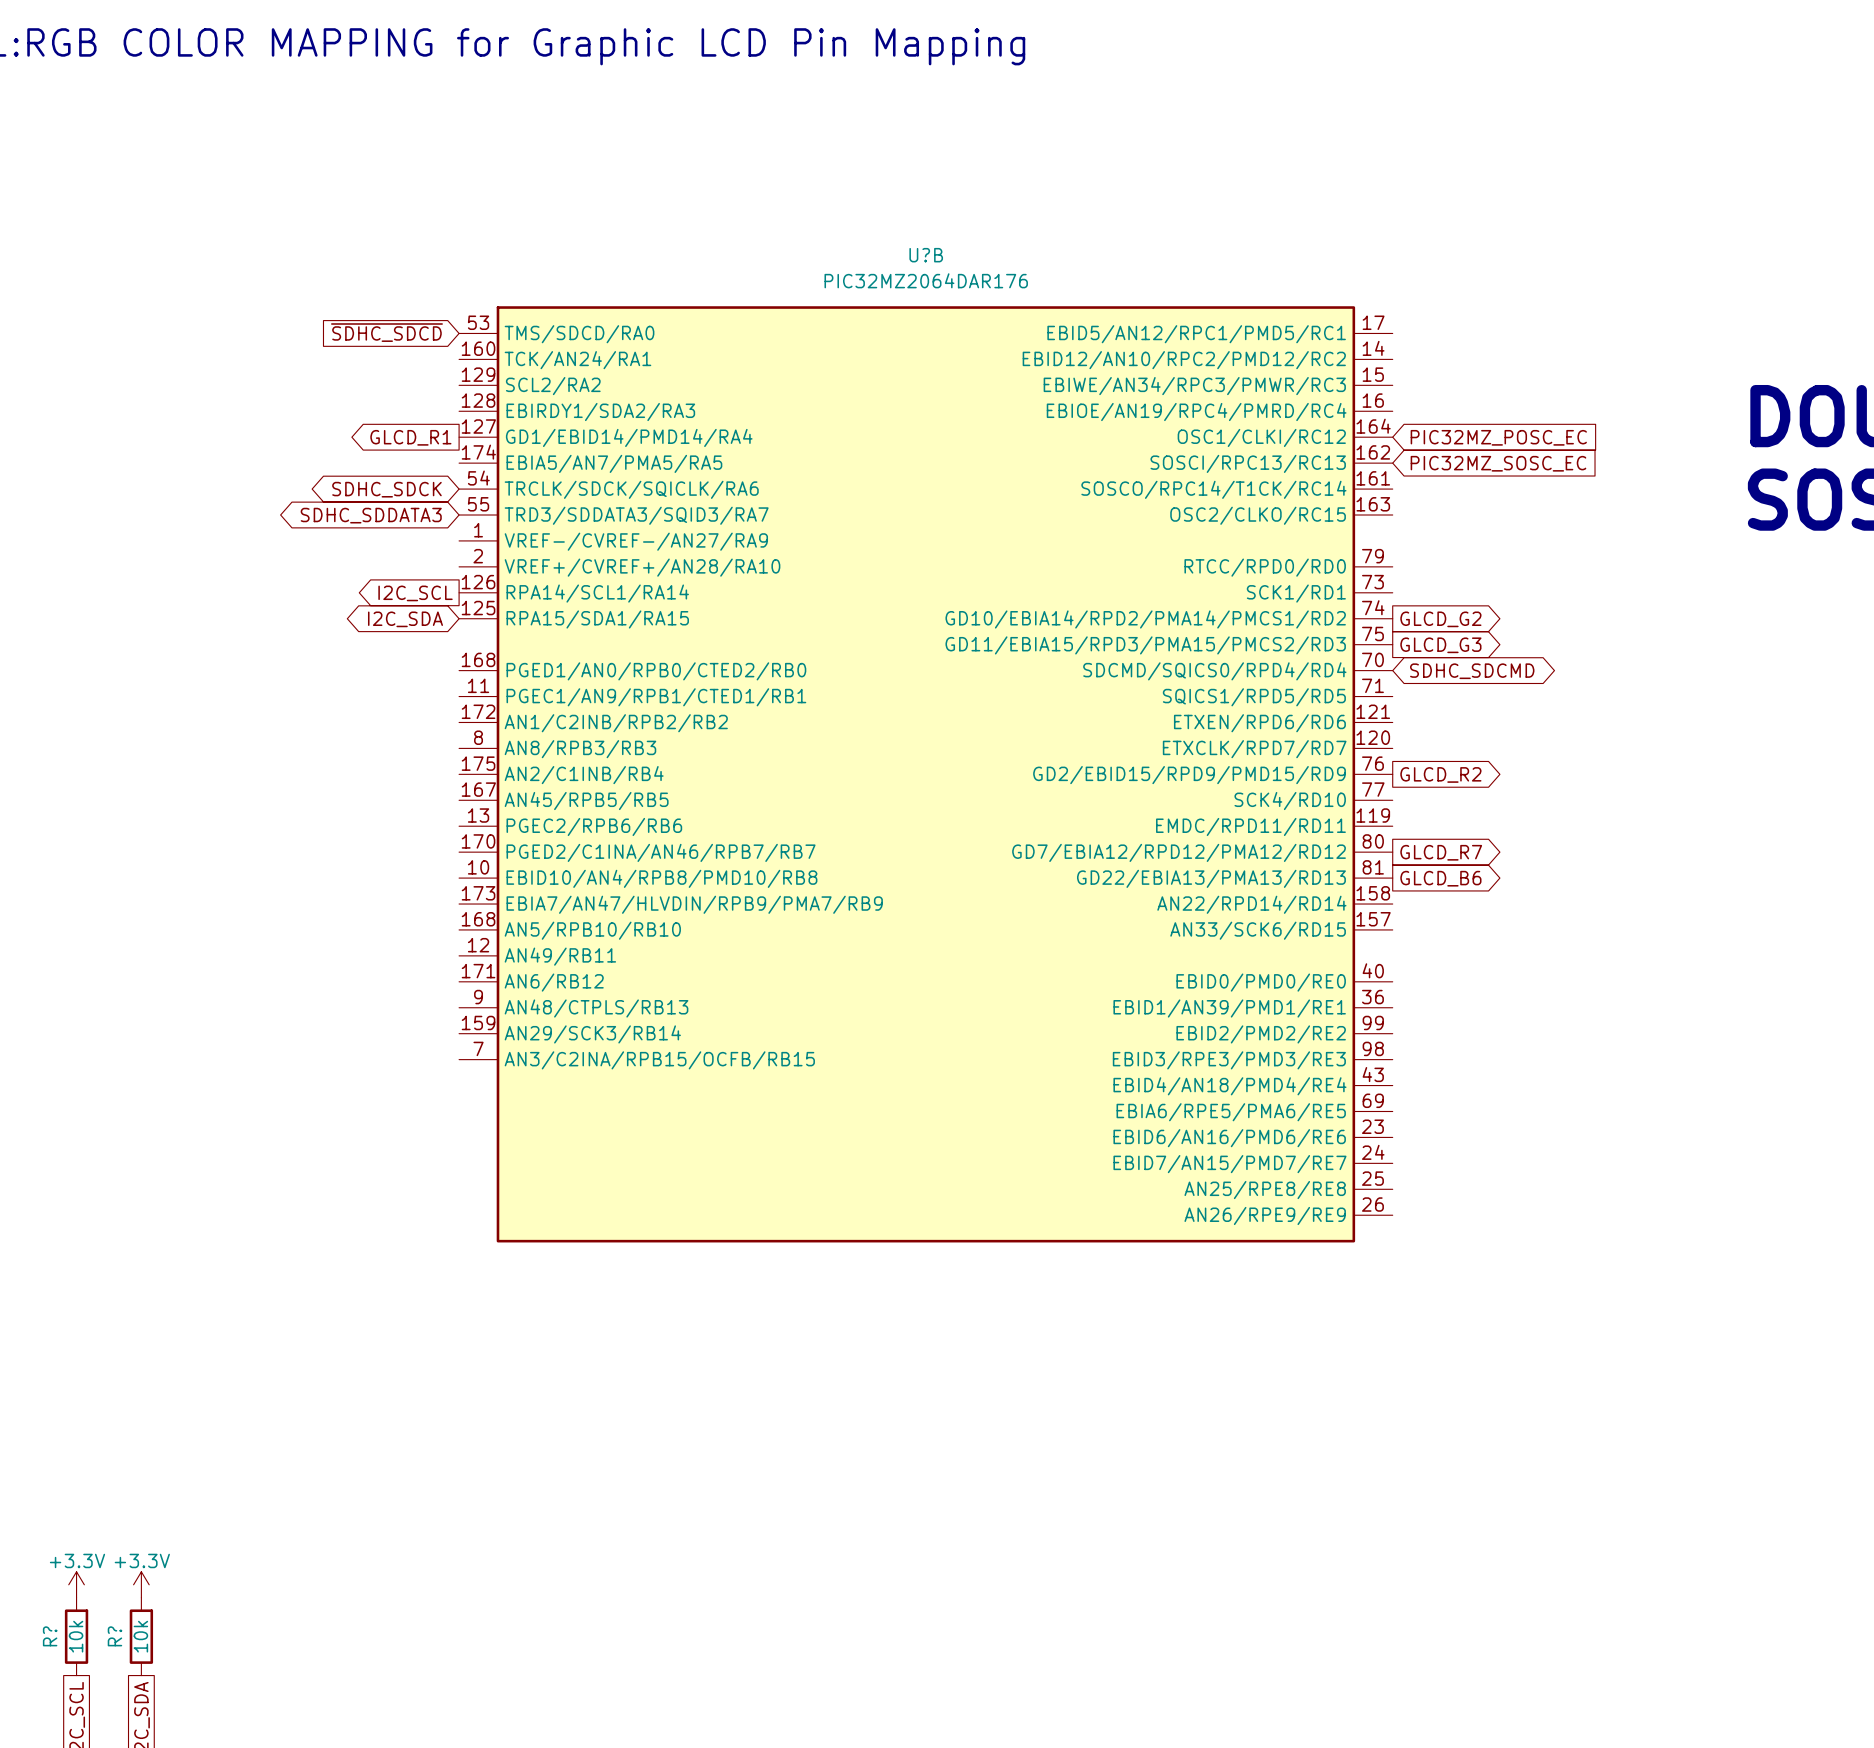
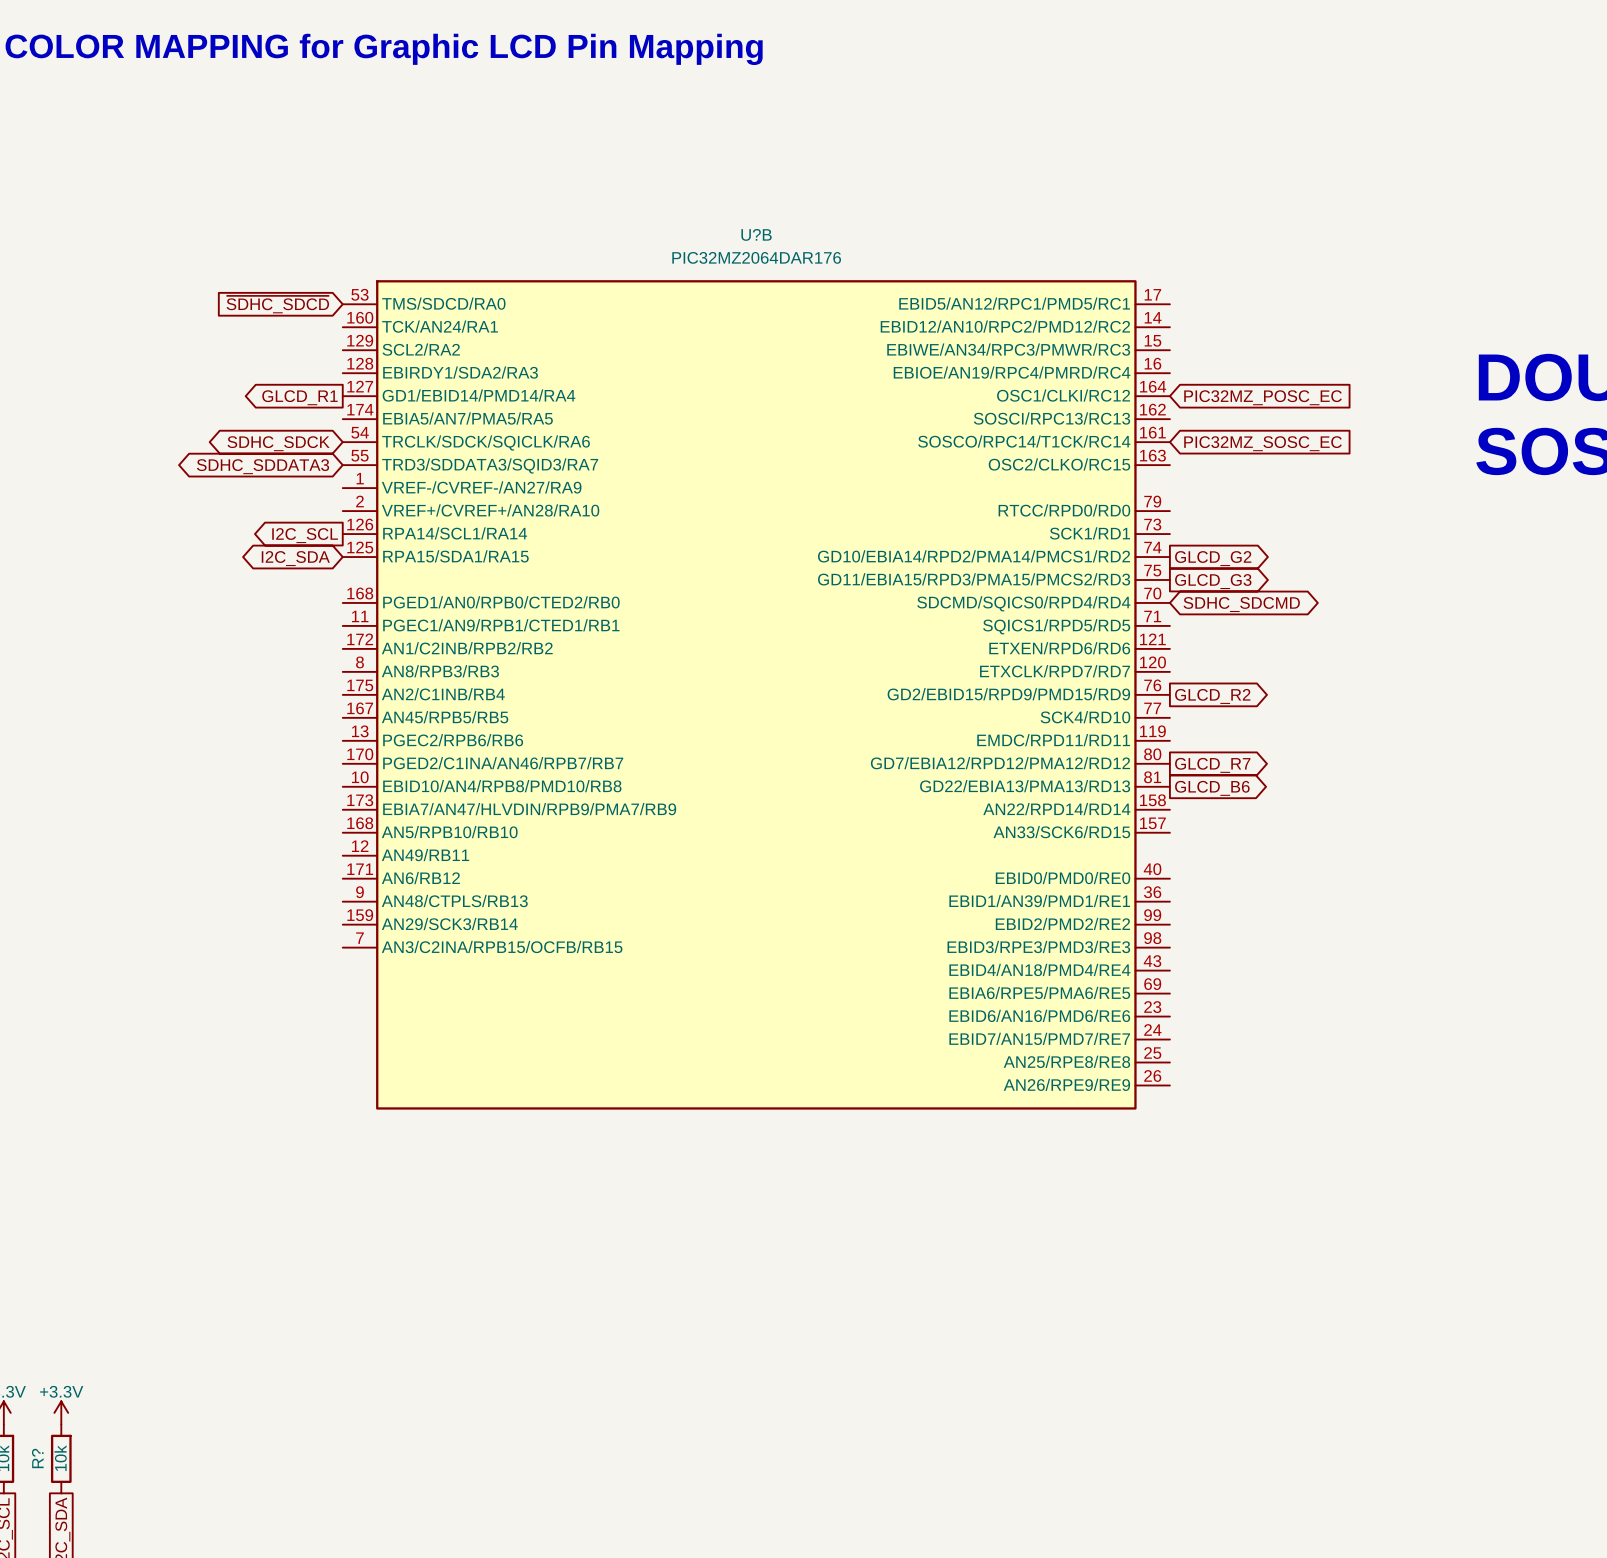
global label position: PIC32MZ_SOSC_EC (1498, 463) -> PIC32MZ_SOSC_EC (1263, 443)

